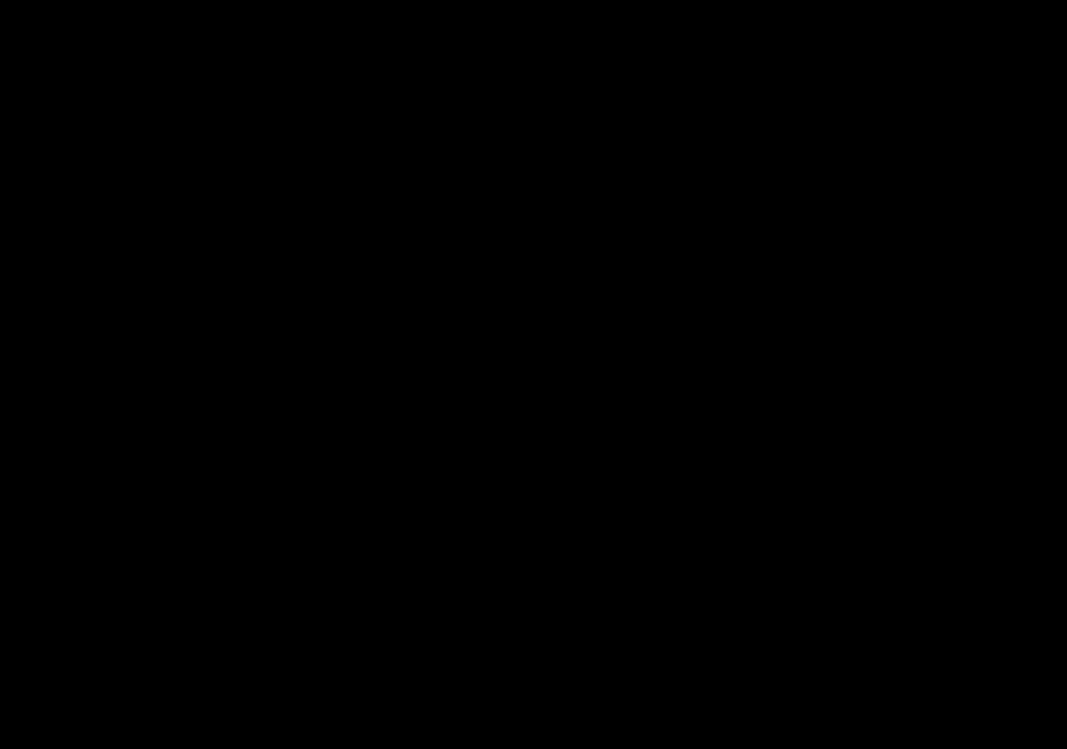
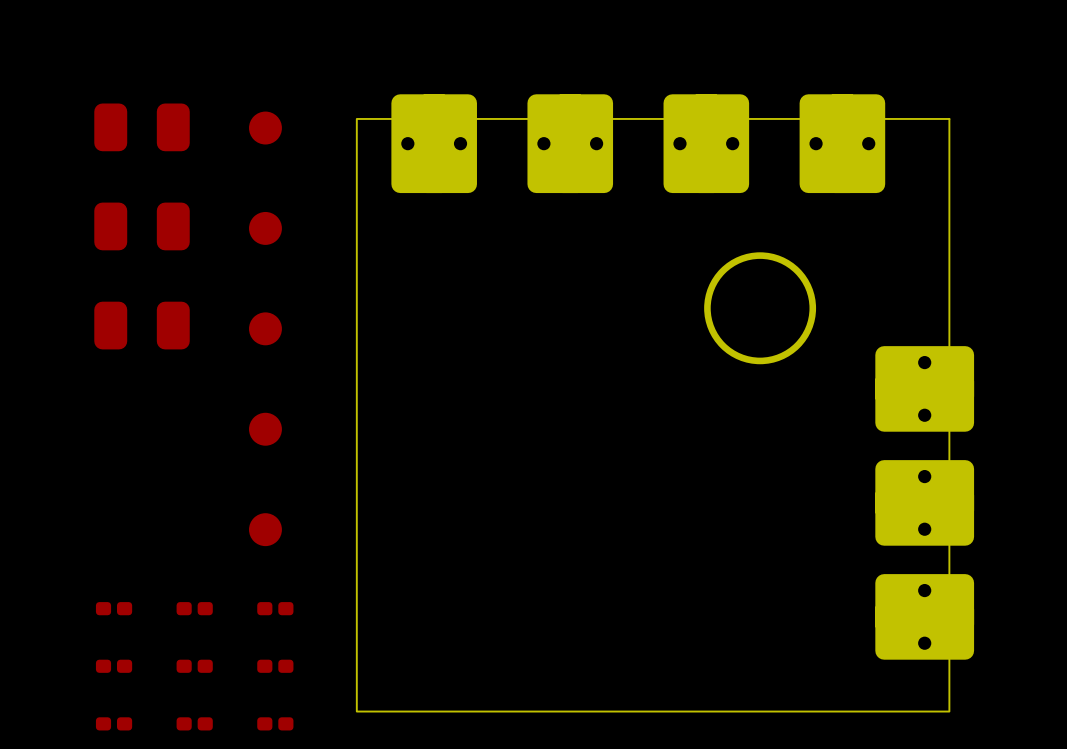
part: none -> (142, 127)
part: none -> (265, 128)
part: none -> (142, 226)
part: none -> (265, 228)
part: none -> (142, 325)
part: none -> (265, 328)
part: none -> (656, 411)
part: none -> (265, 429)
part: none -> (265, 529)
part: none -> (114, 608)
part: none -> (194, 608)
part: none -> (275, 608)
part: none -> (114, 666)
part: none -> (194, 666)
part: none -> (275, 666)
part: none -> (114, 723)
part: none -> (194, 723)
part: none -> (275, 723)

